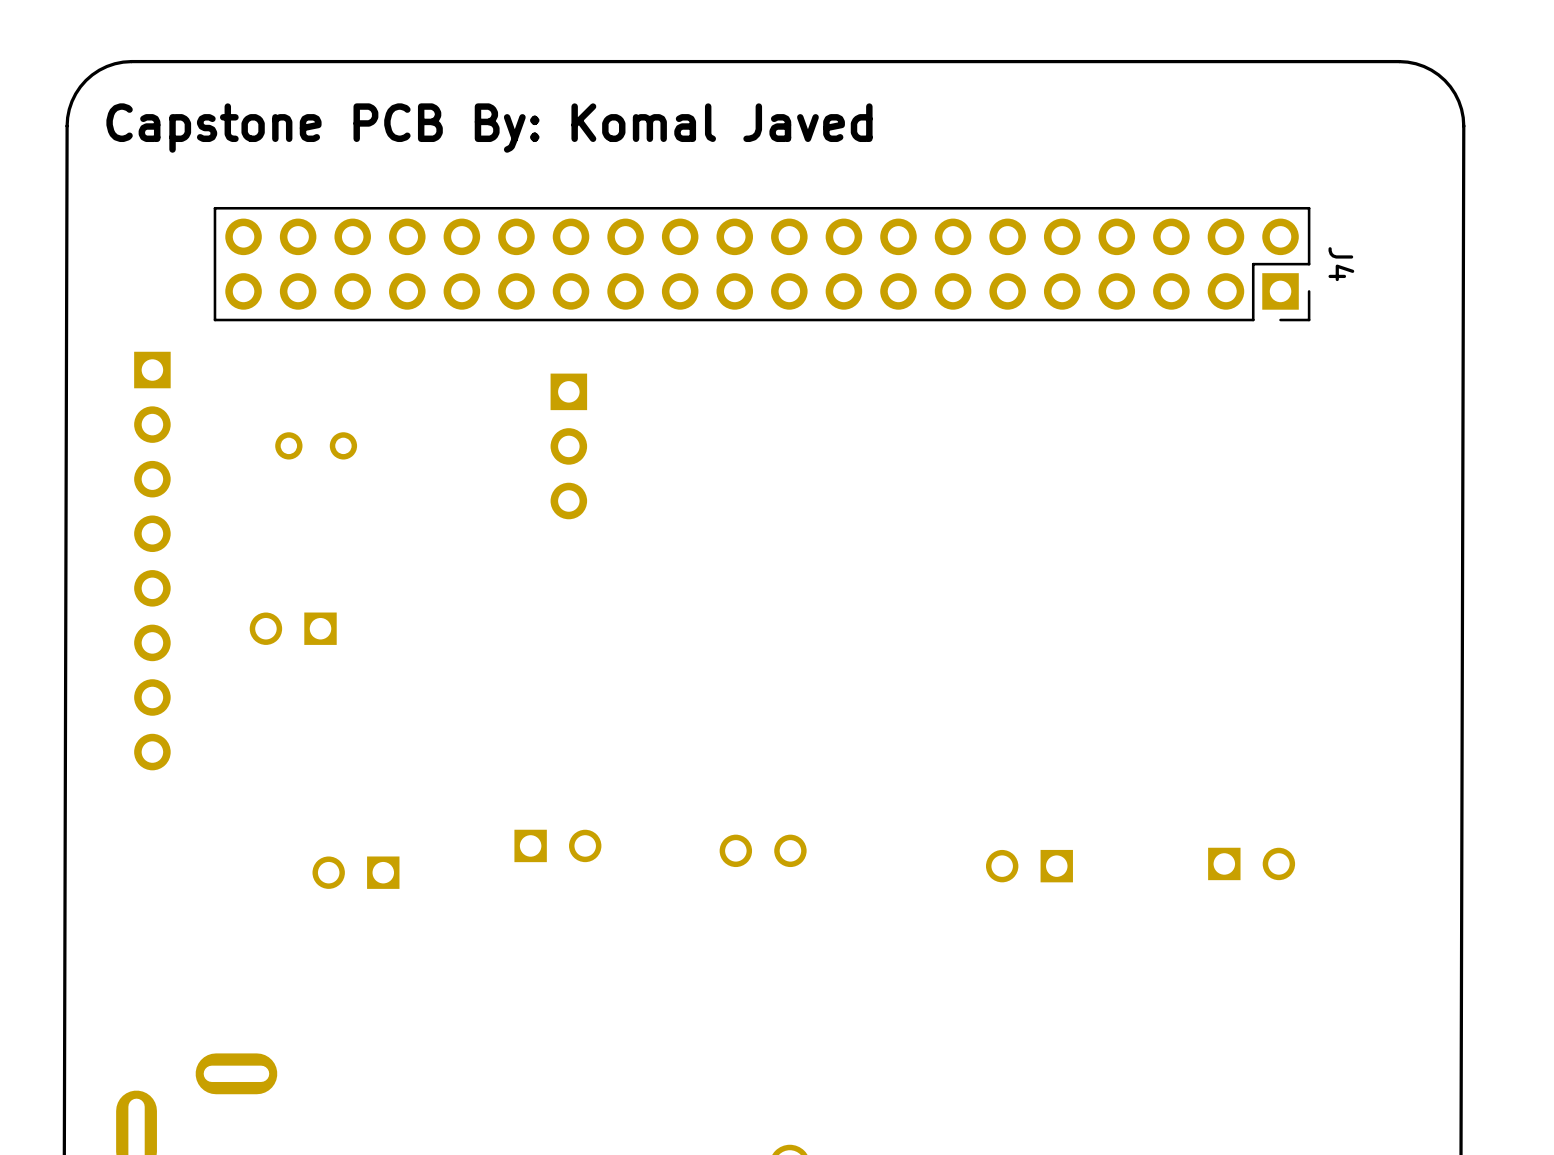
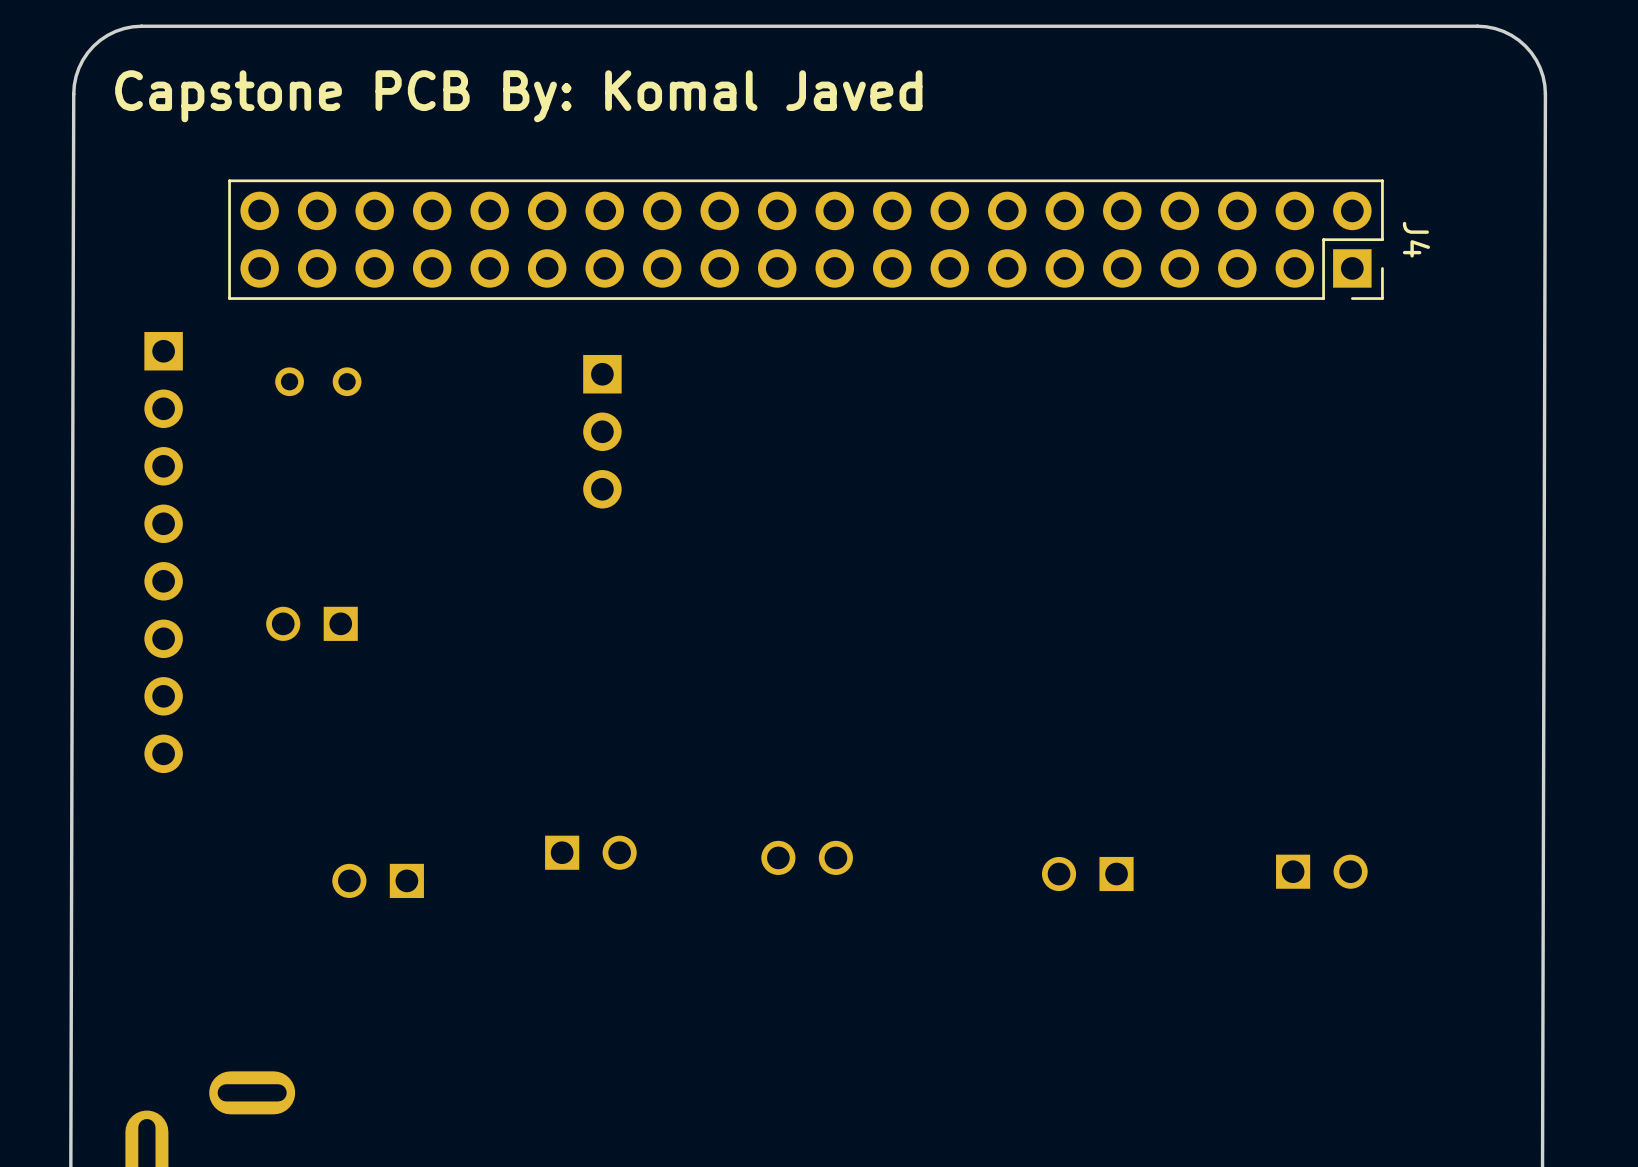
part position: (316, 445) -> (318, 381)

